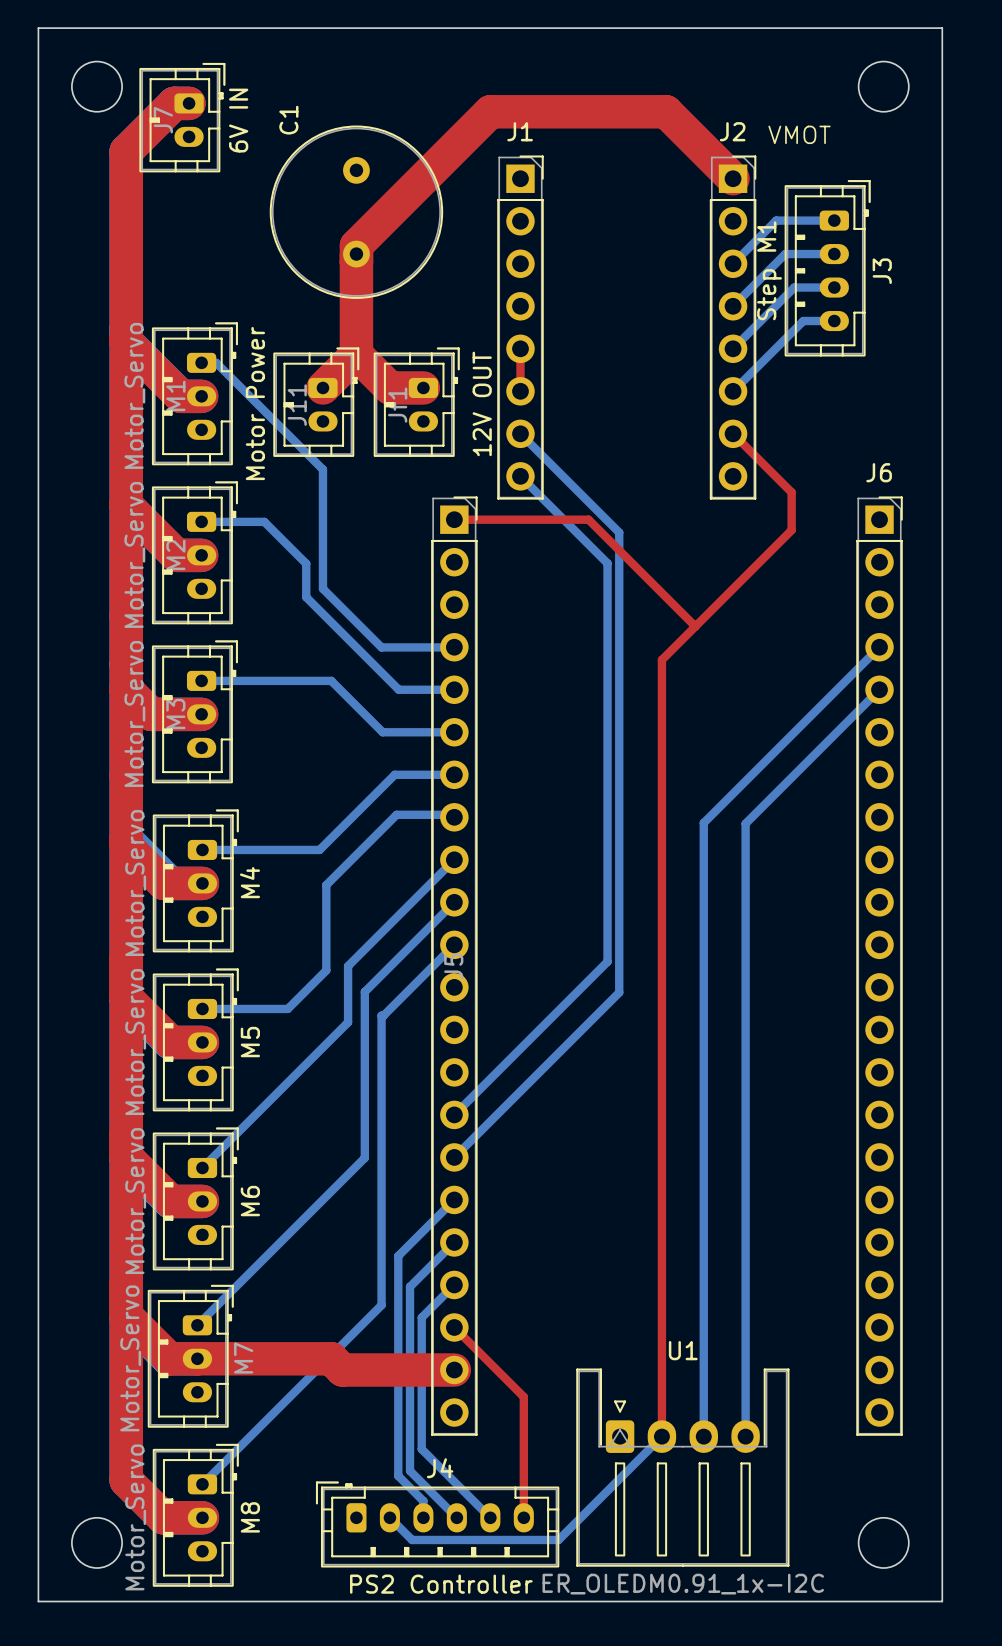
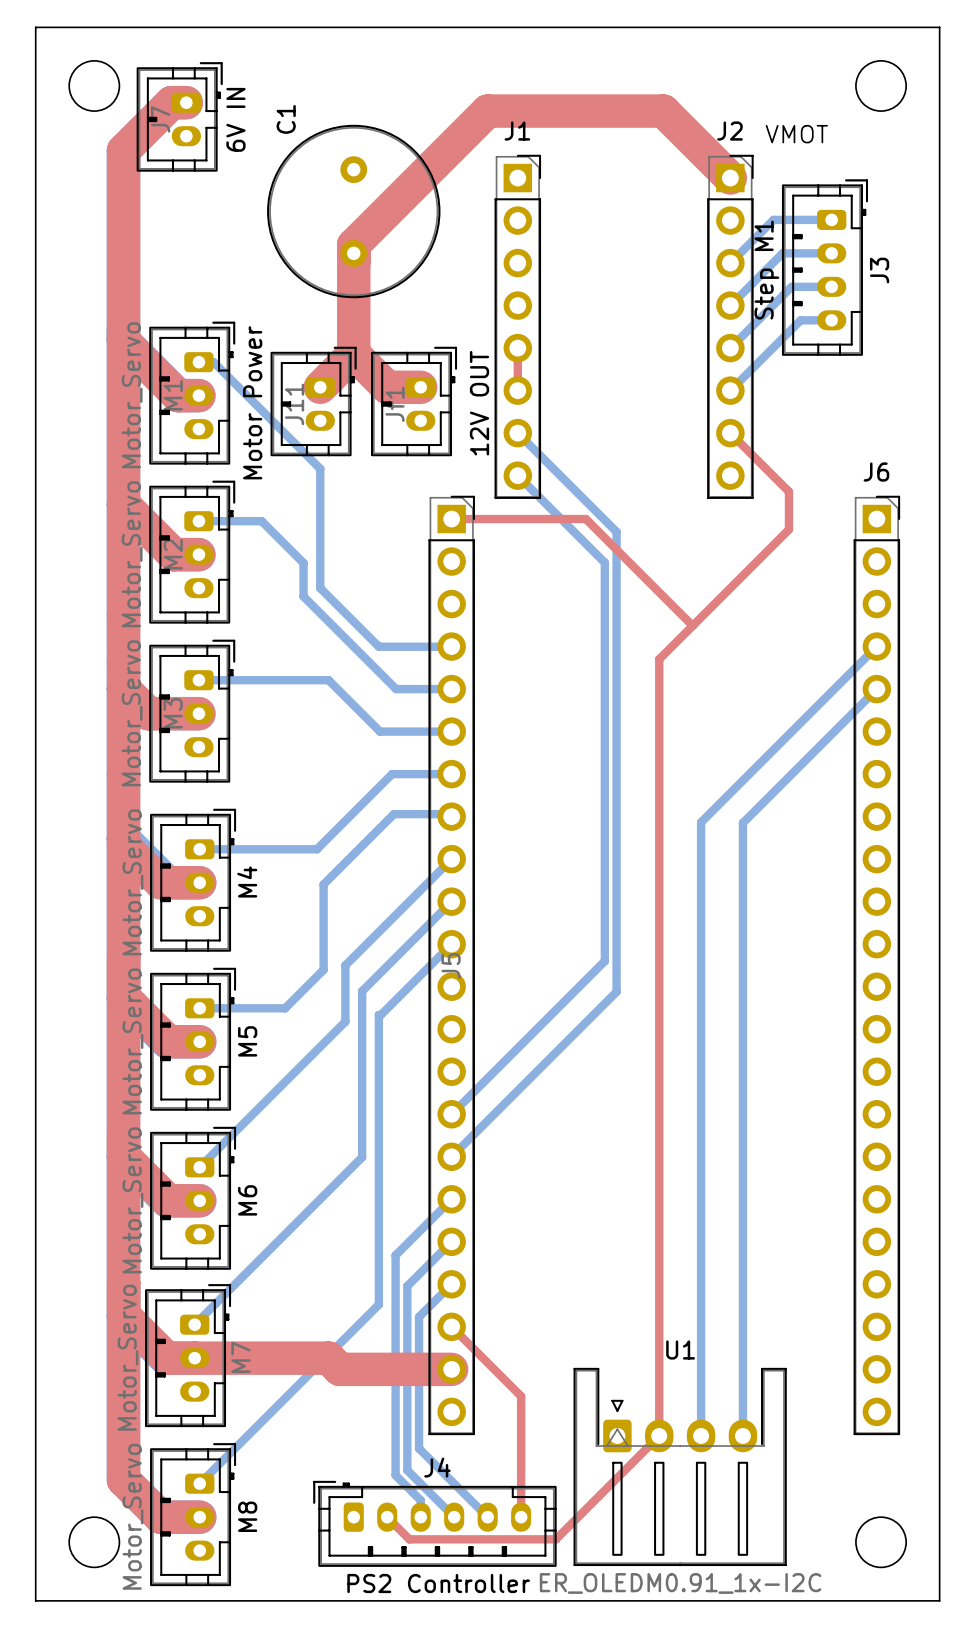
top track: none -> (659, 1435) (555, 1539) (409, 1539) (387, 1517)
bottom track: (661, 1436) (558, 1539) (412, 1539) (389, 1517) -> none

